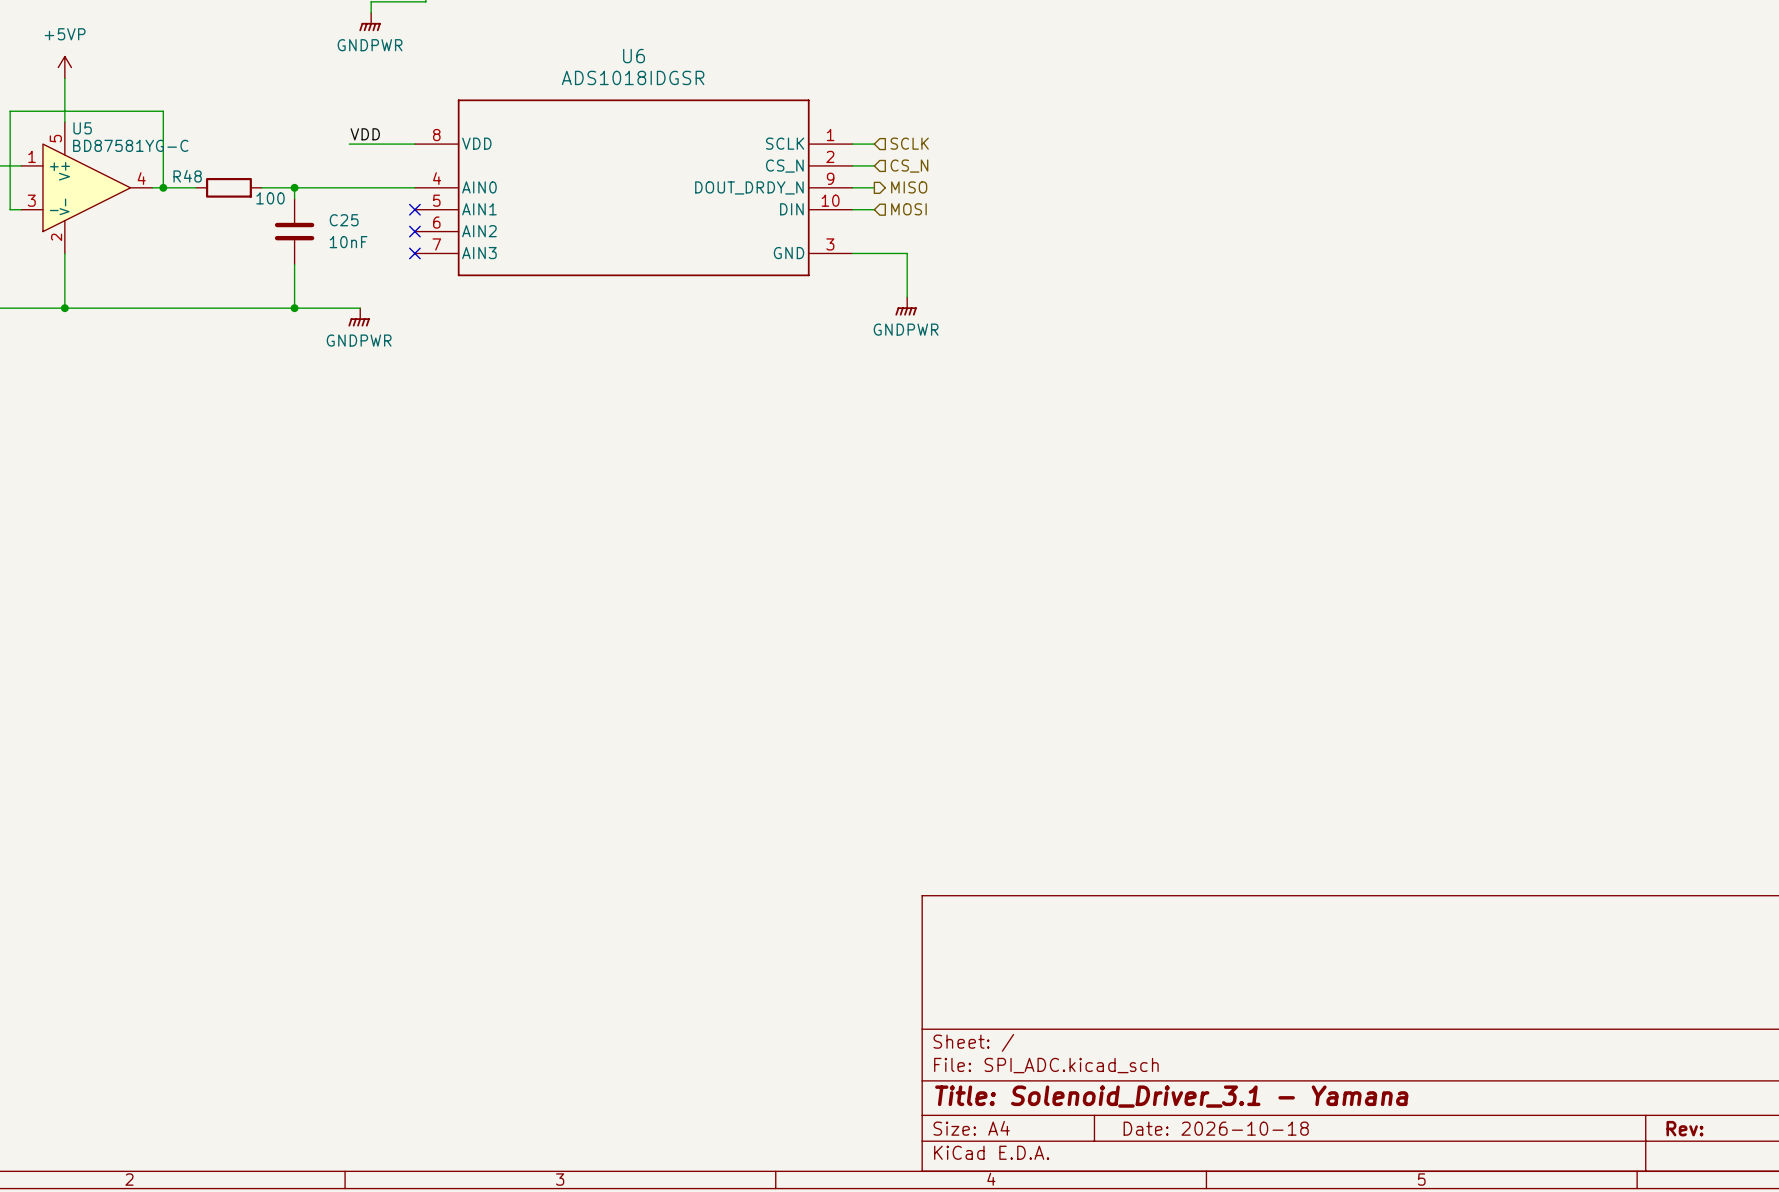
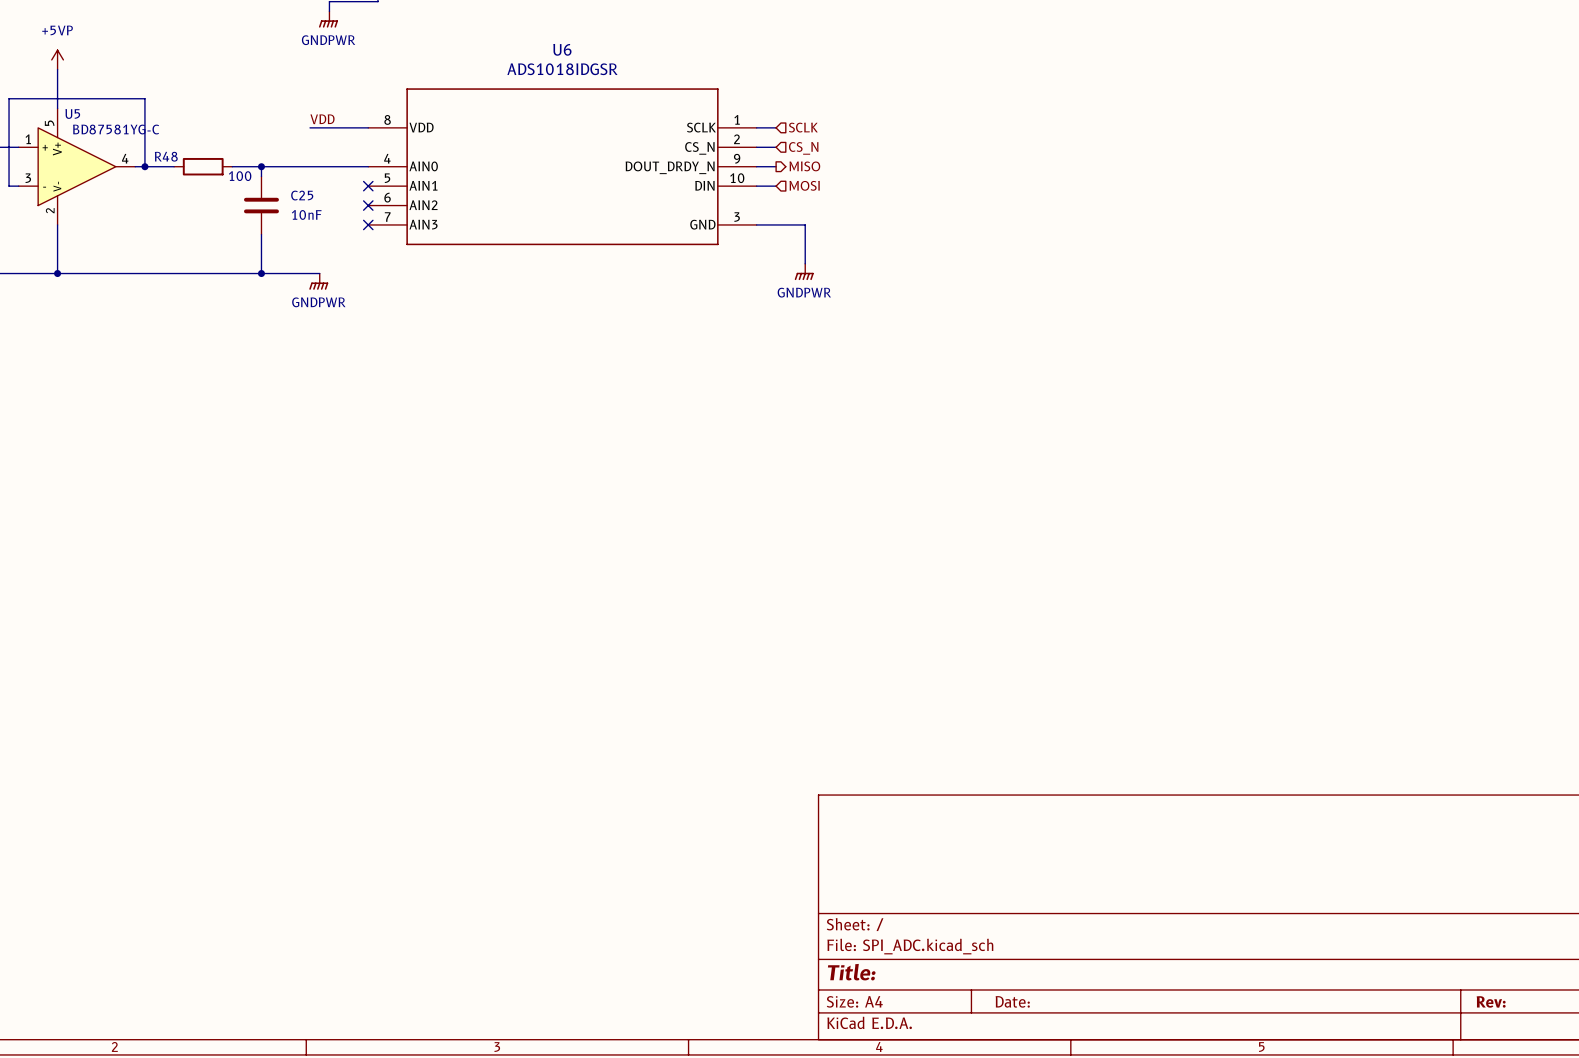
title block: Title: Solenoid_Driver_3.1 - Yamana (1171, 1096) -> Title: (851, 972)
title block: Date: 2026-10-18 (1216, 1128) -> Date: (1012, 1001)

